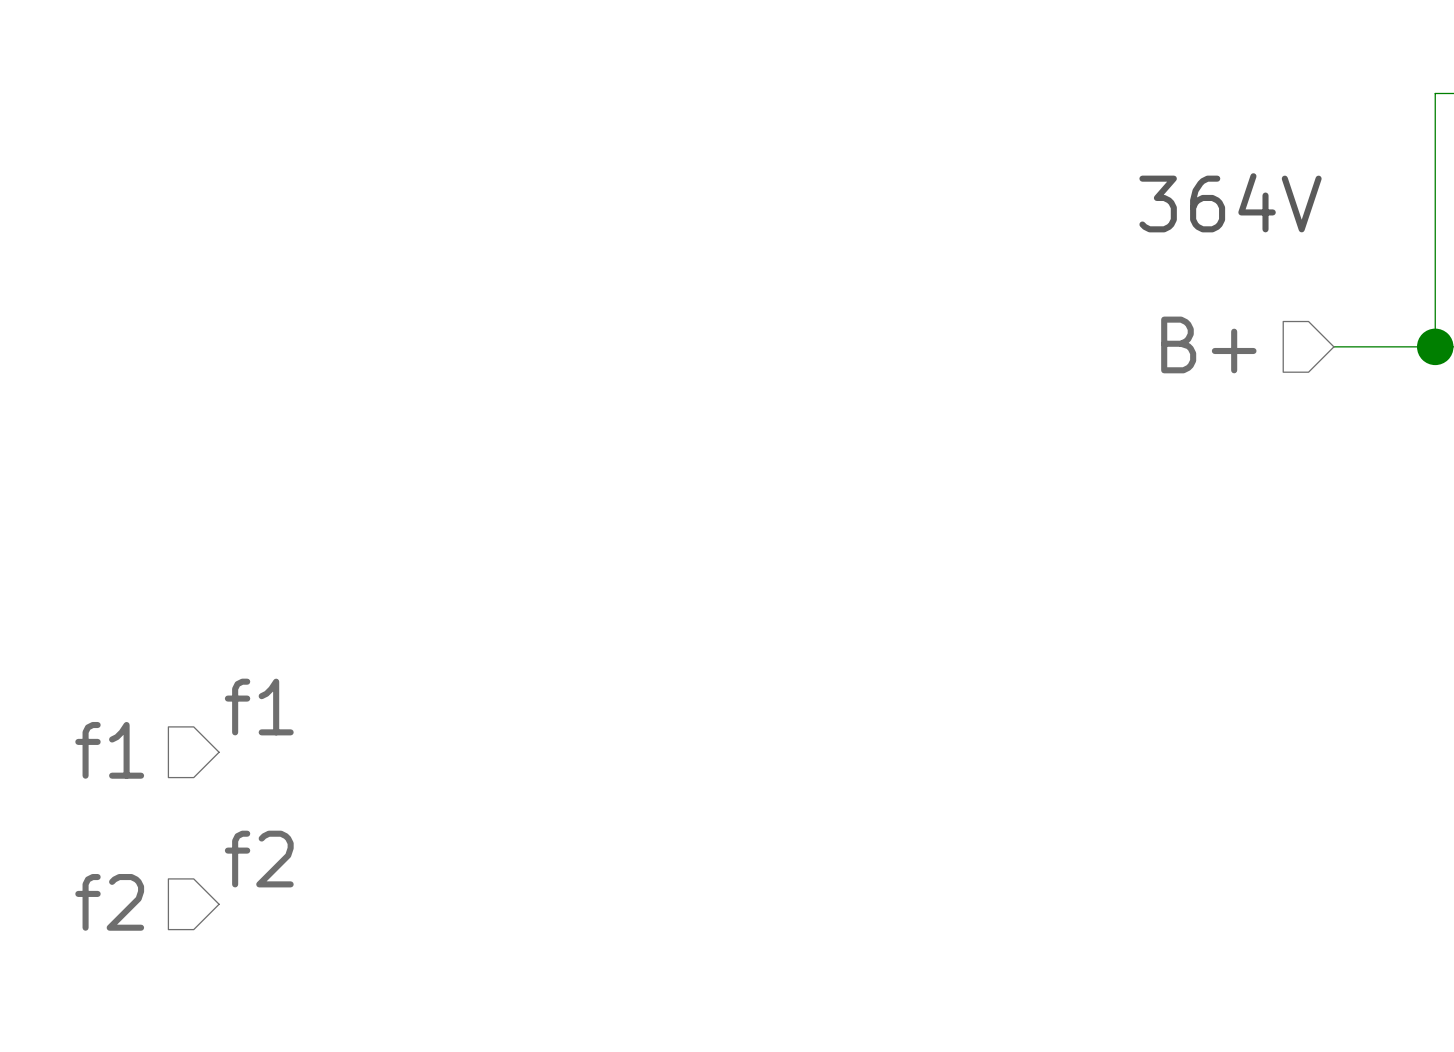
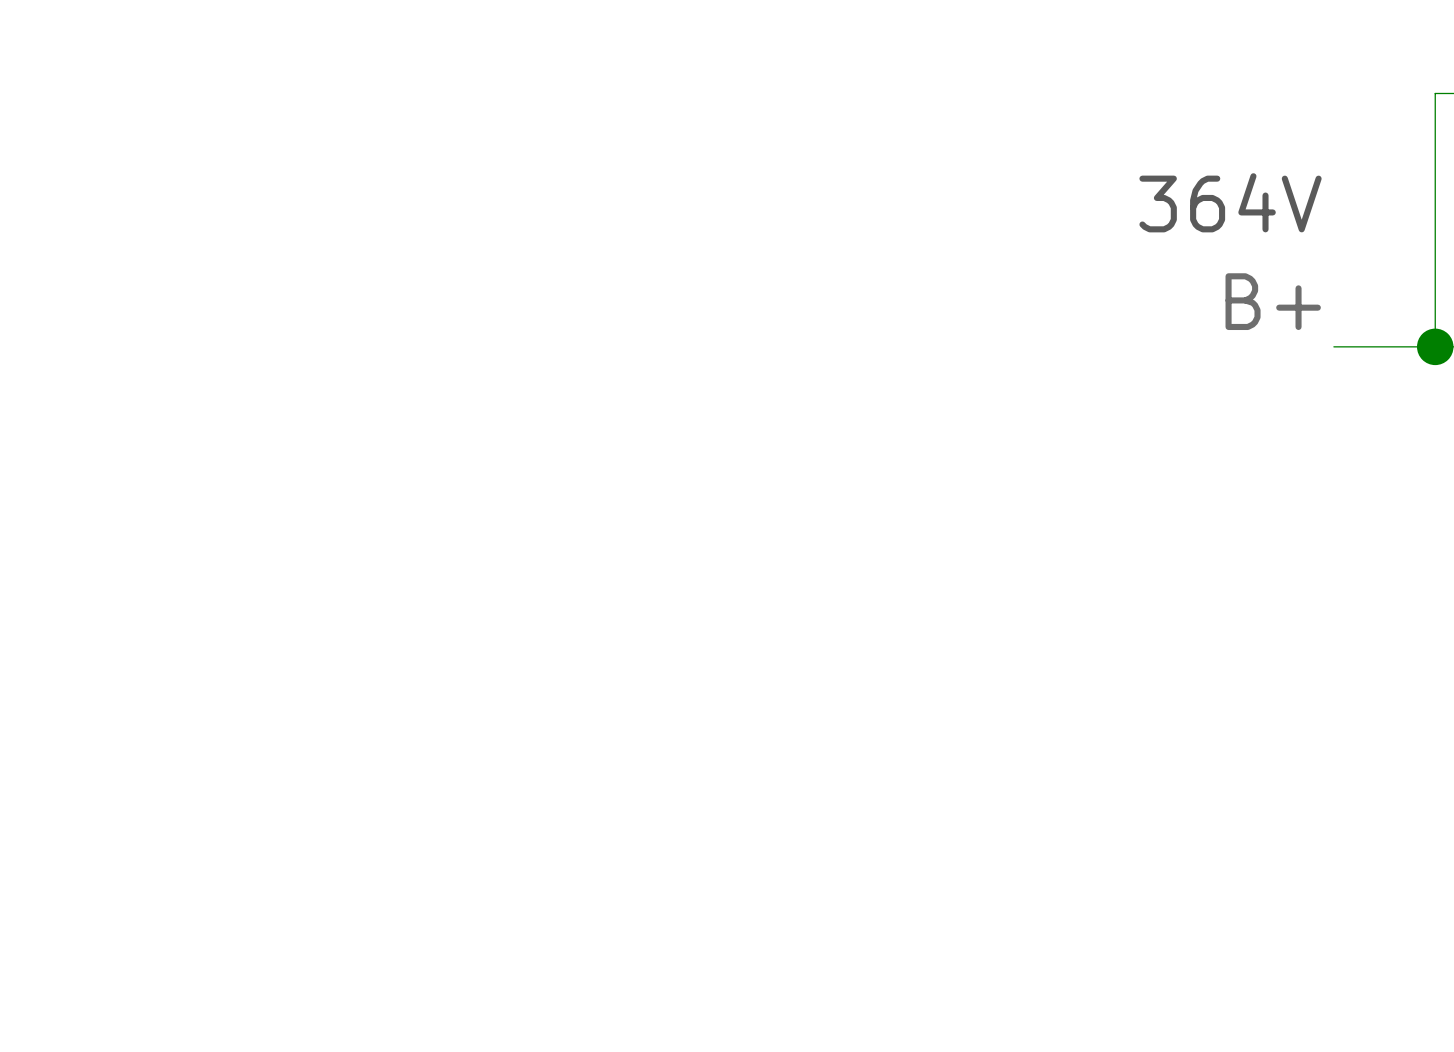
label: none -> B+ (1273, 301)
hierarchical label: B+ (1208, 344) -> none
label: f1 (259, 707) -> none
hierarchical label: f1 (109, 750) -> none
label: f2 (259, 859) -> none
hierarchical label: f2 (109, 902) -> none

